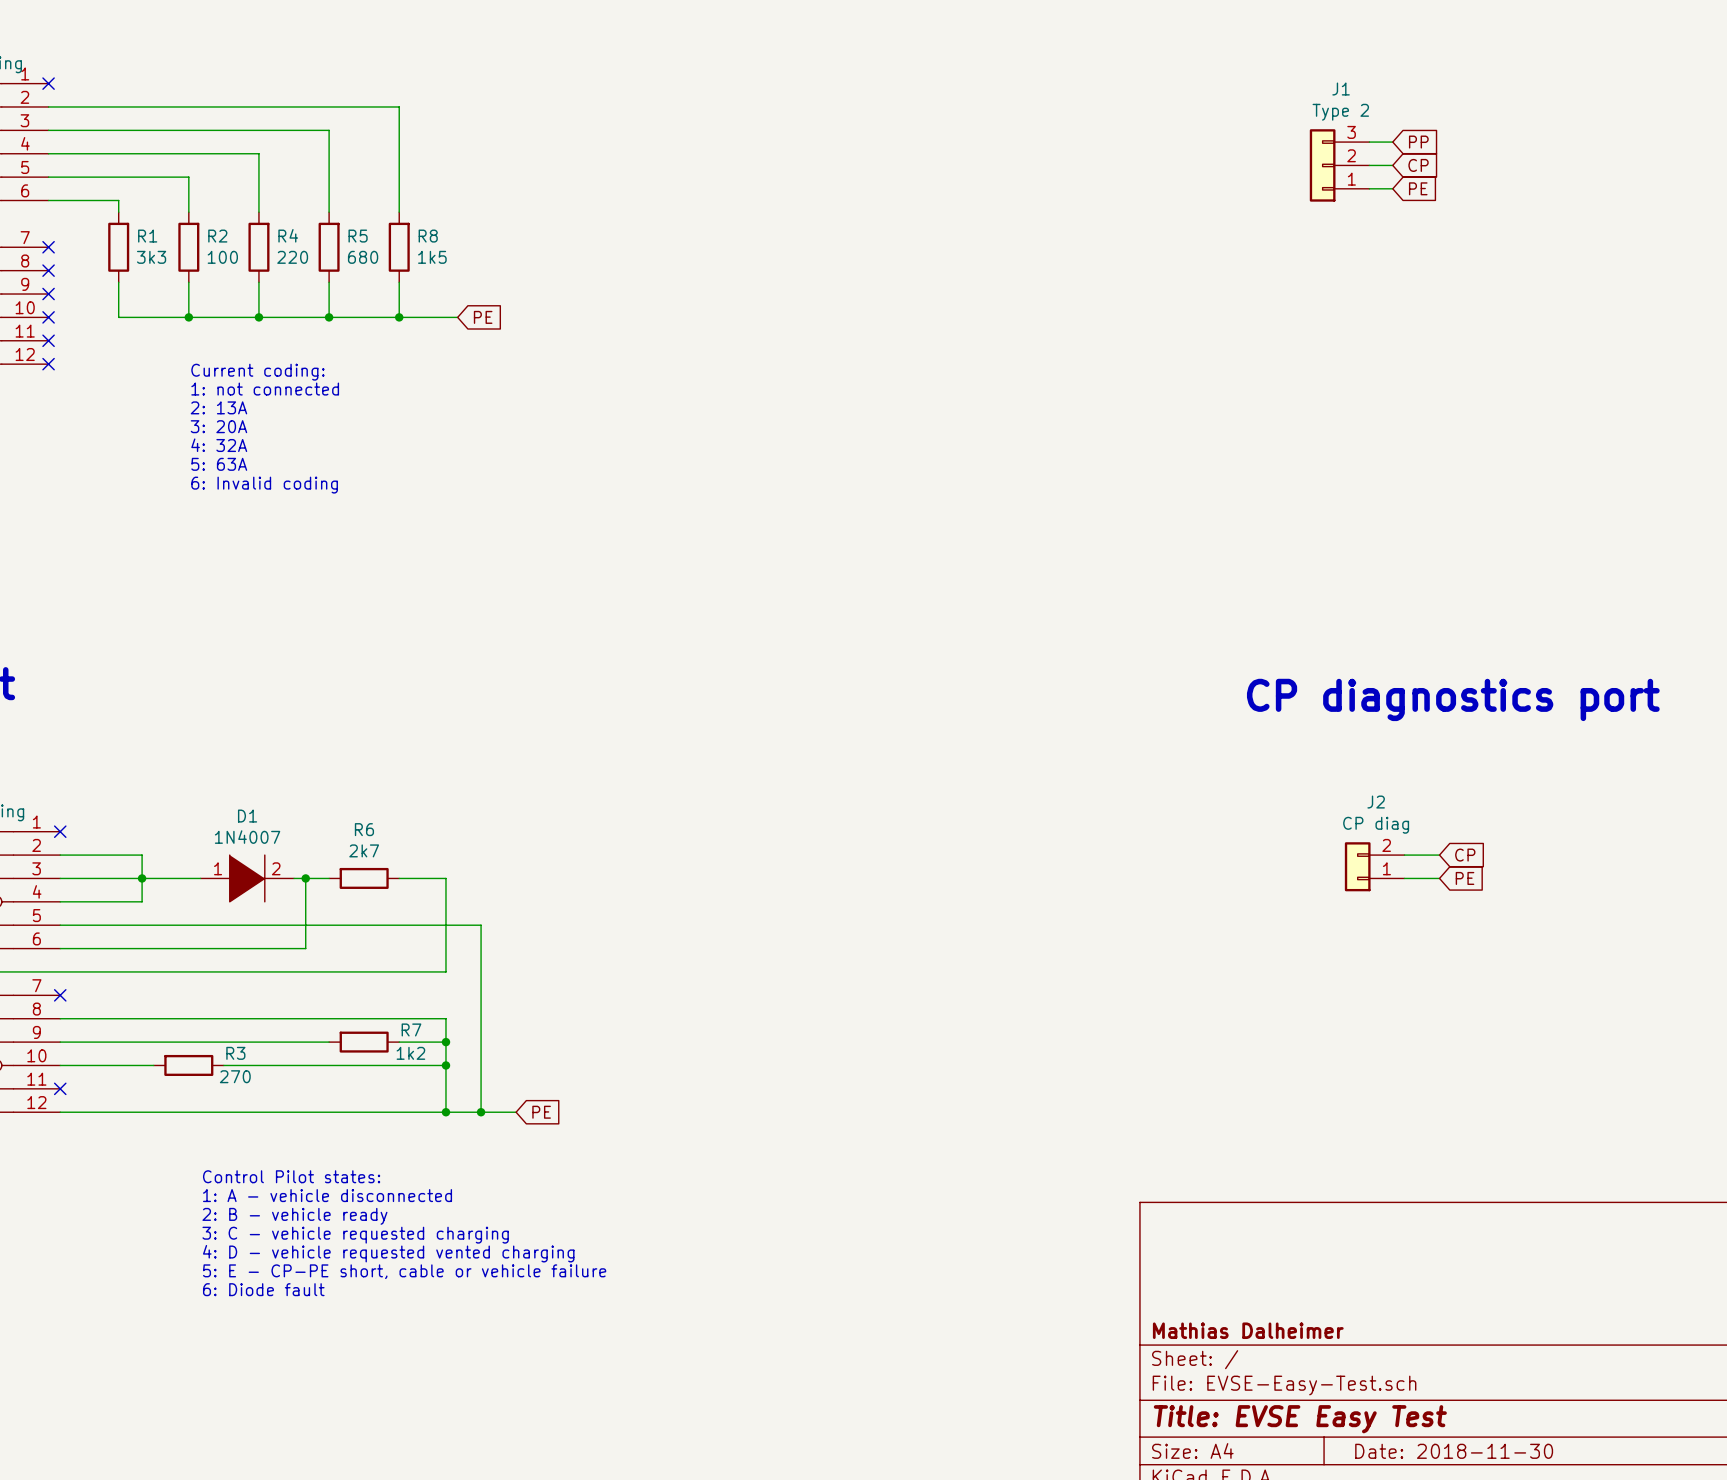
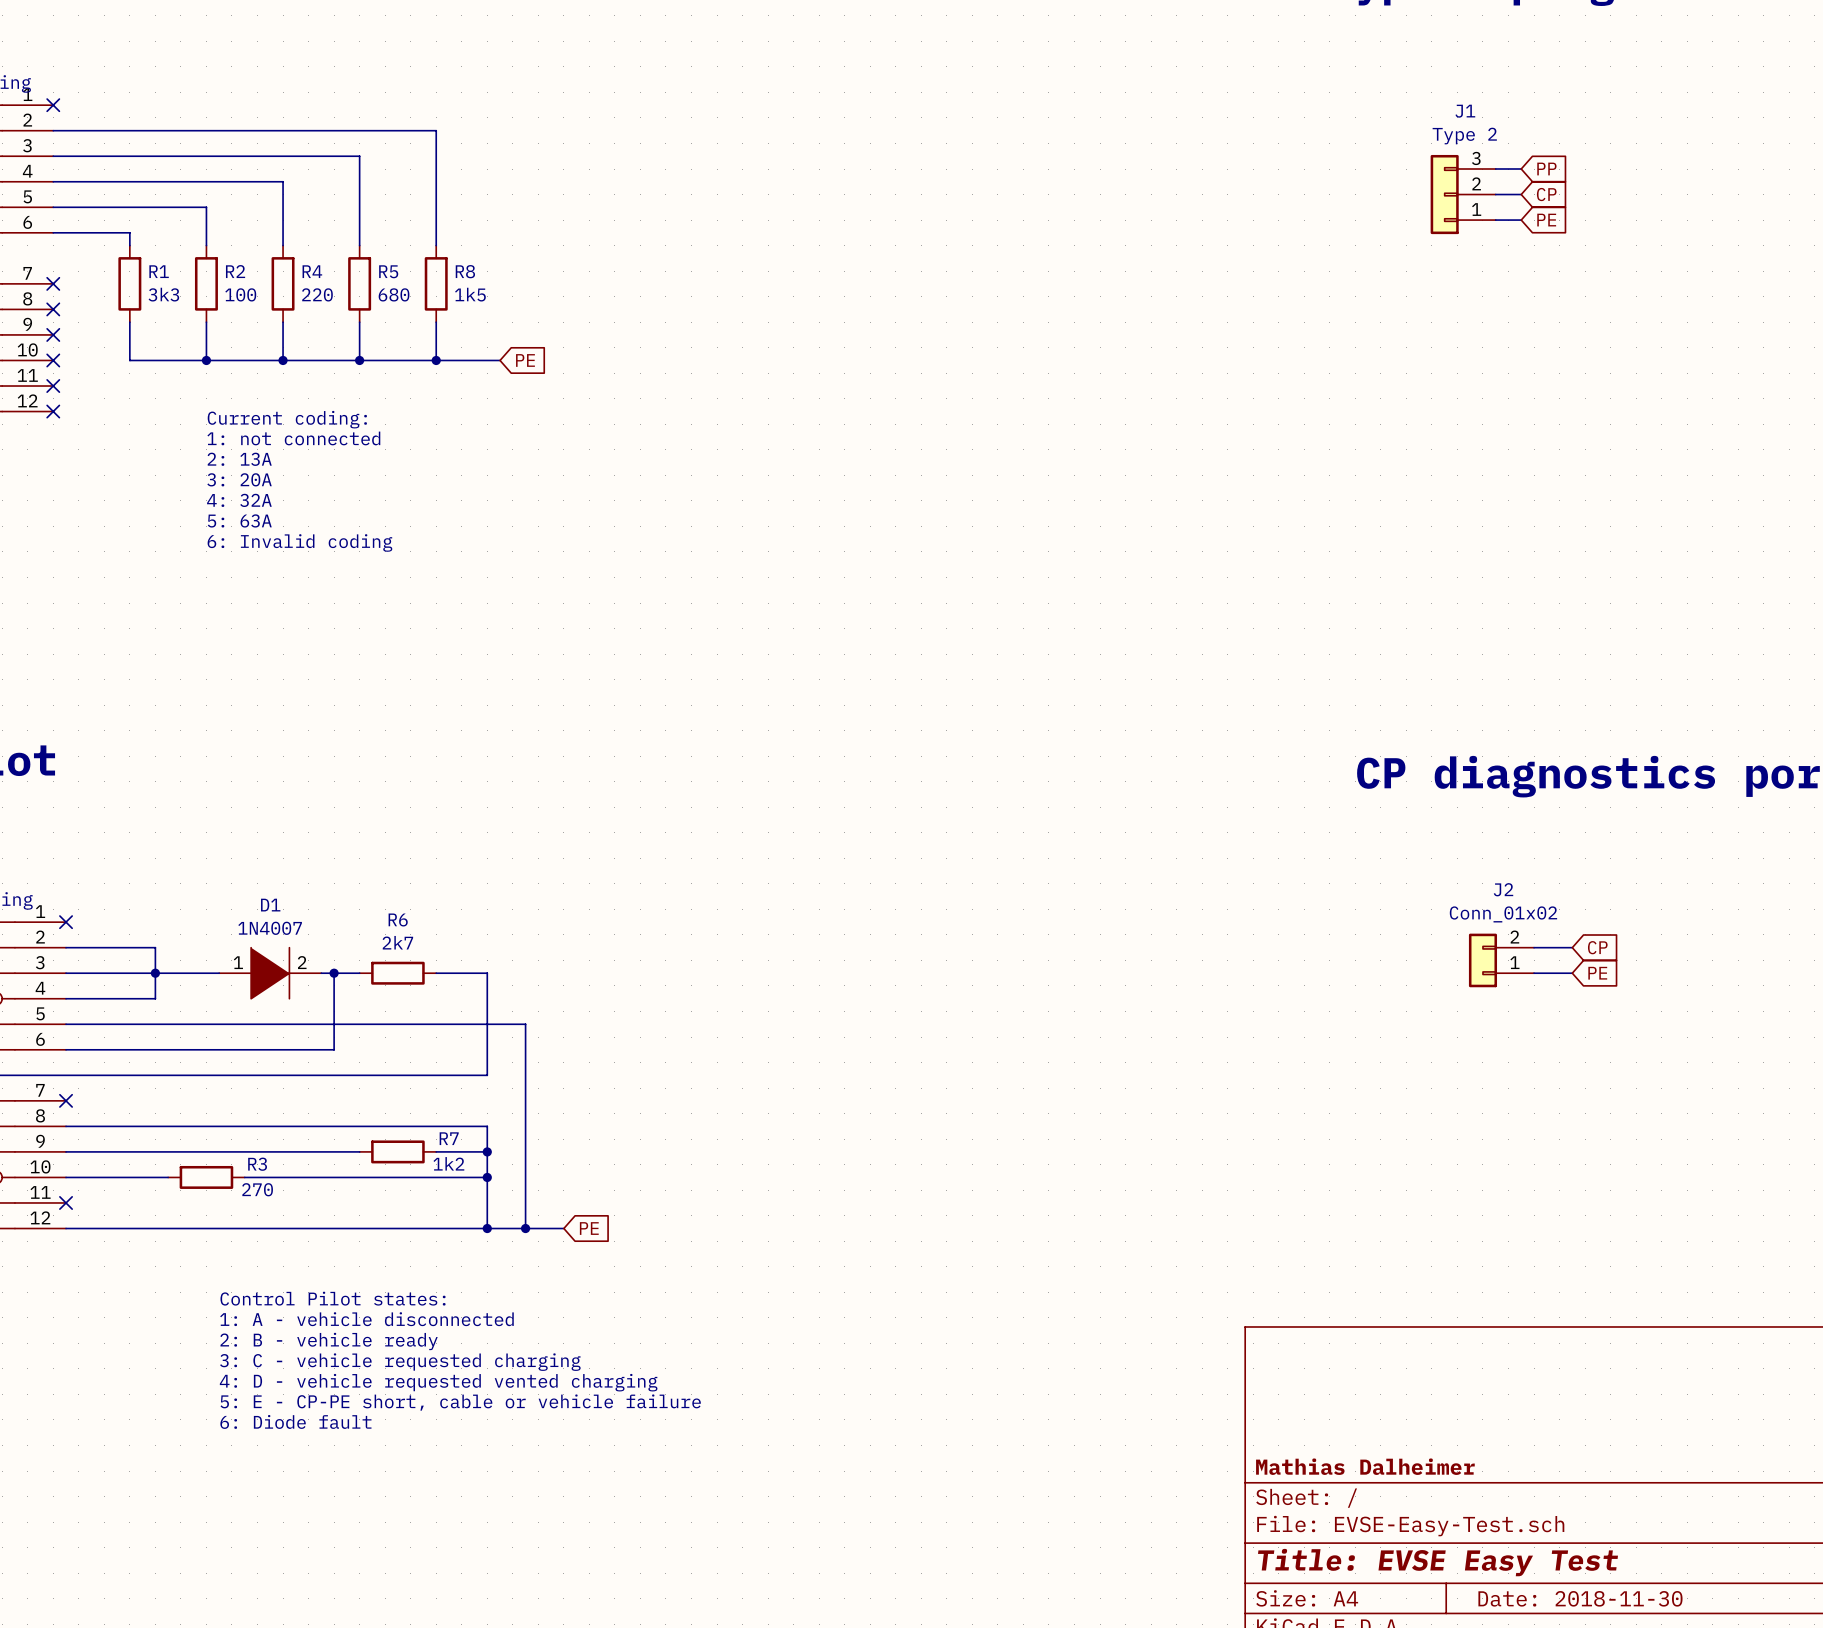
J2 value: CP diag (1376, 825) -> Conn_01x02 (1503, 914)

